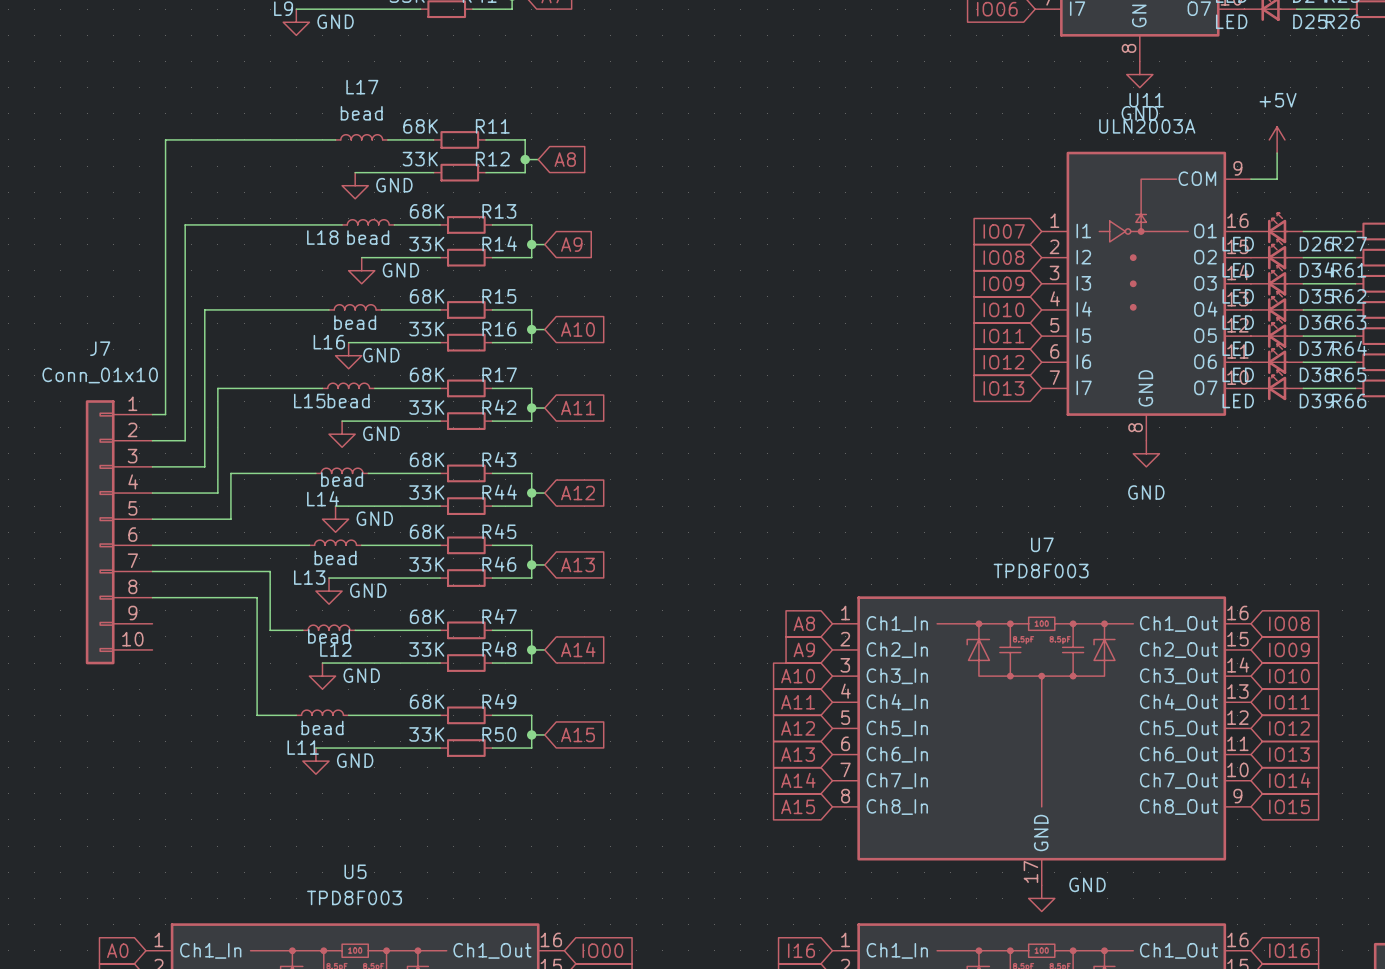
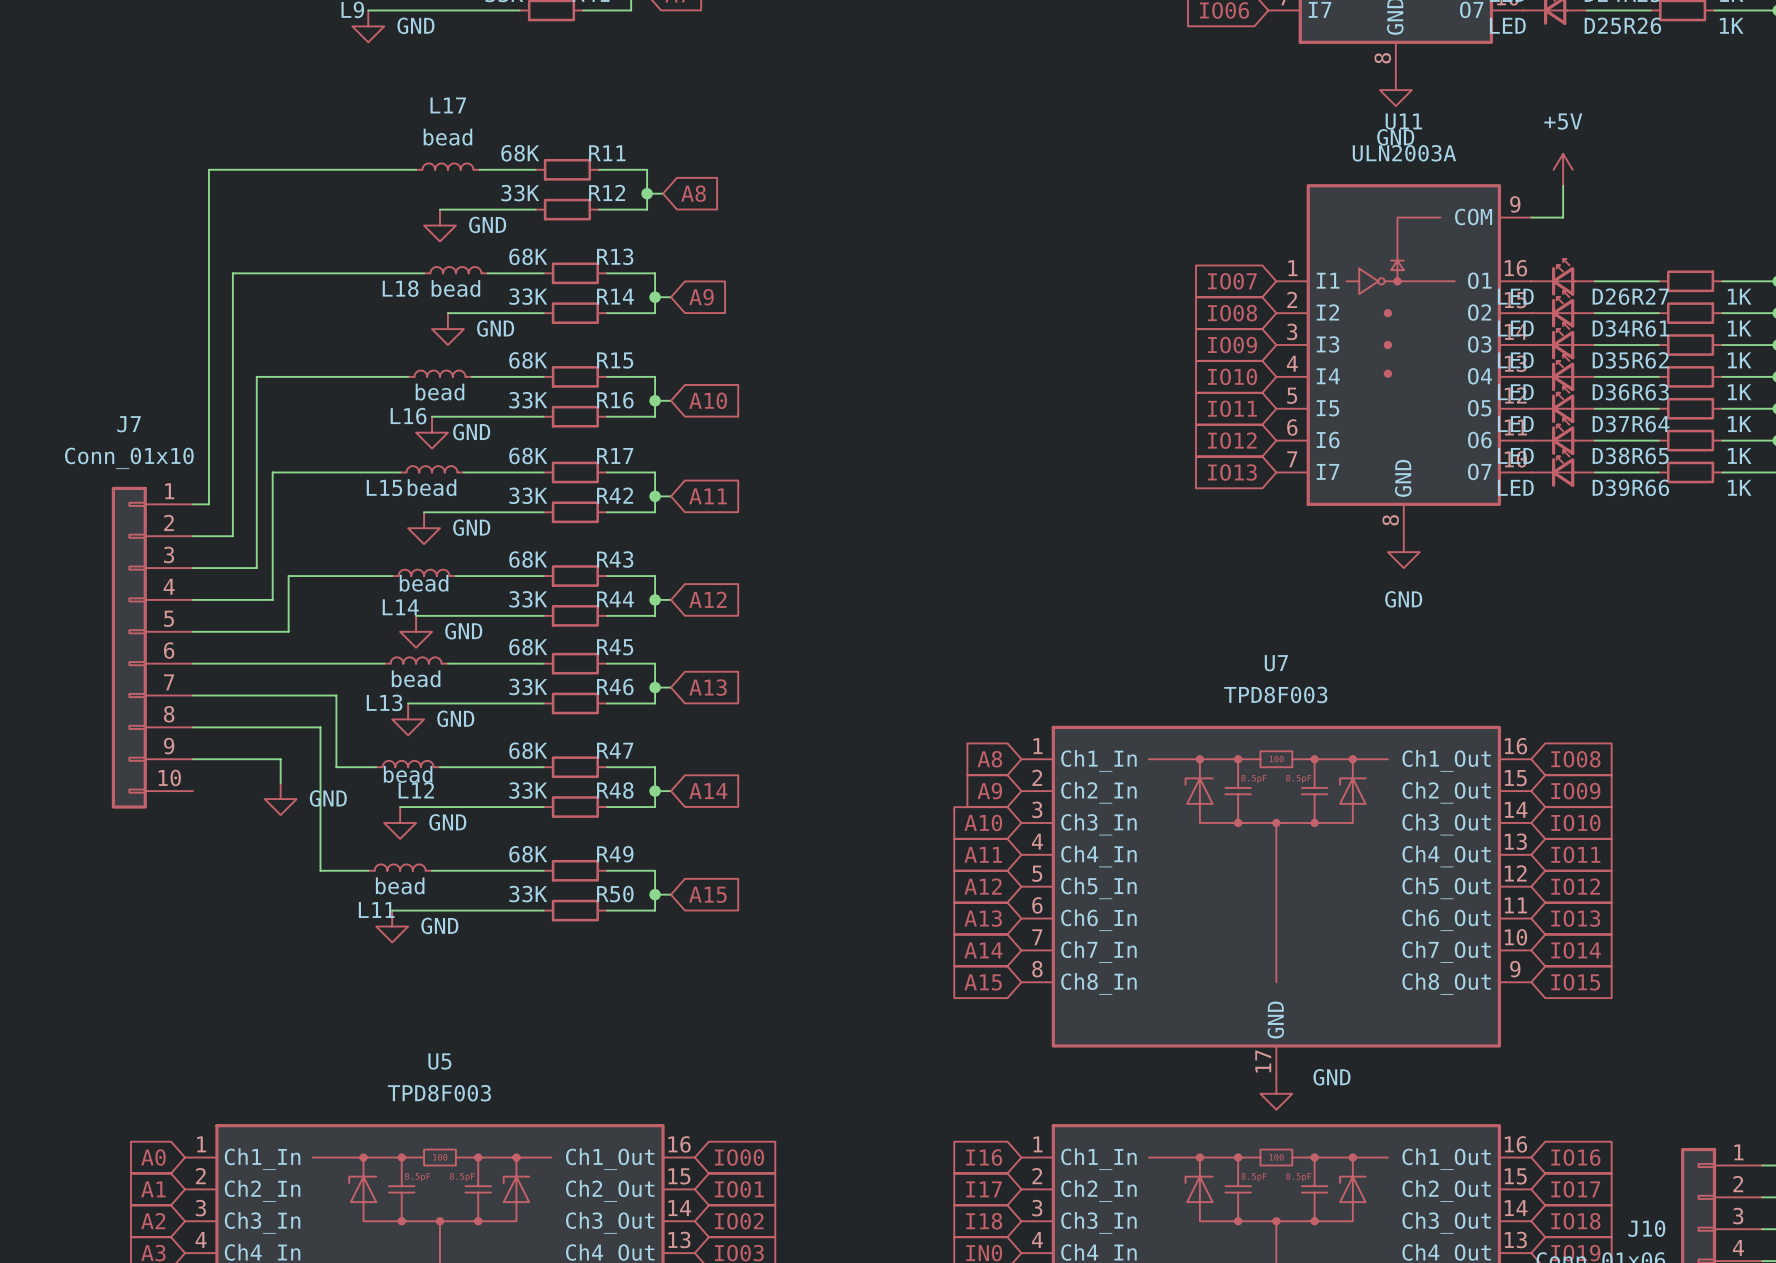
wire: none -> (193, 759) (280, 759) (280, 783)
power symbol: none -> GND (280, 799)

